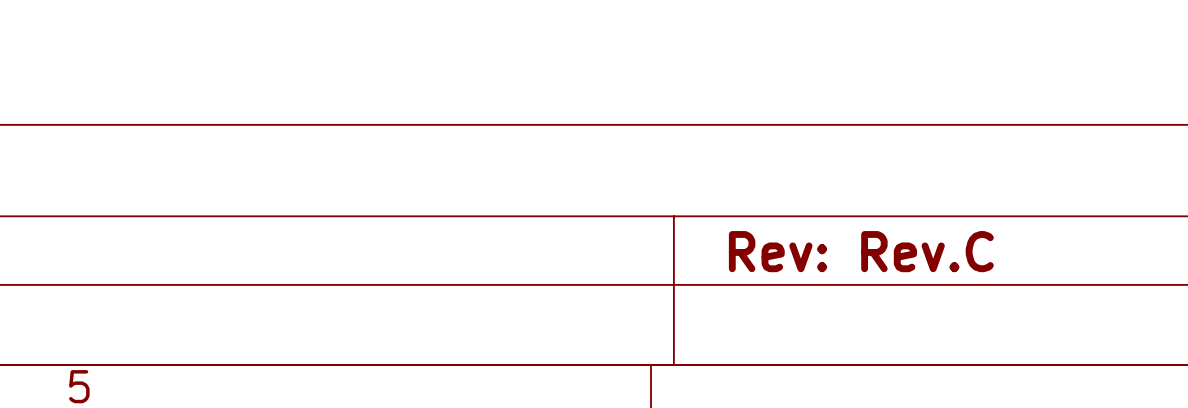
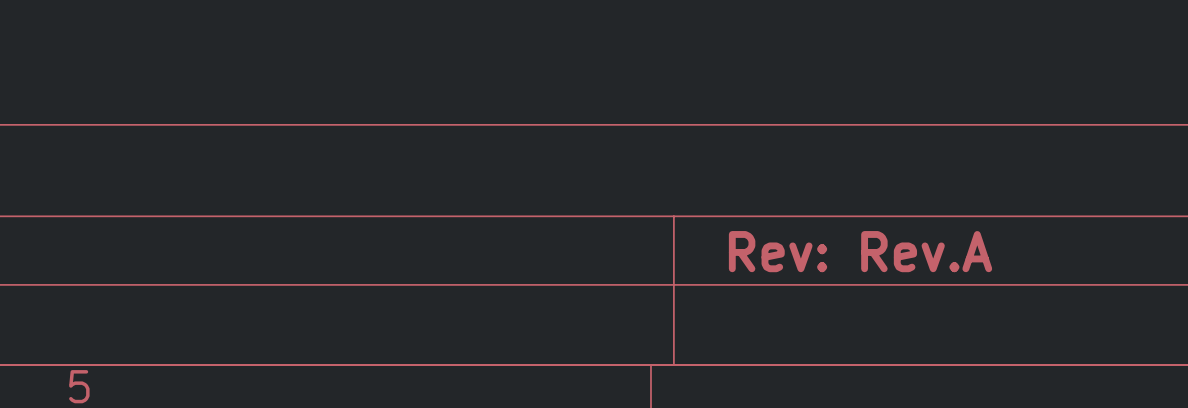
title block: Rev: Rev.C (861, 251) -> Rev: Rev.A (860, 251)

